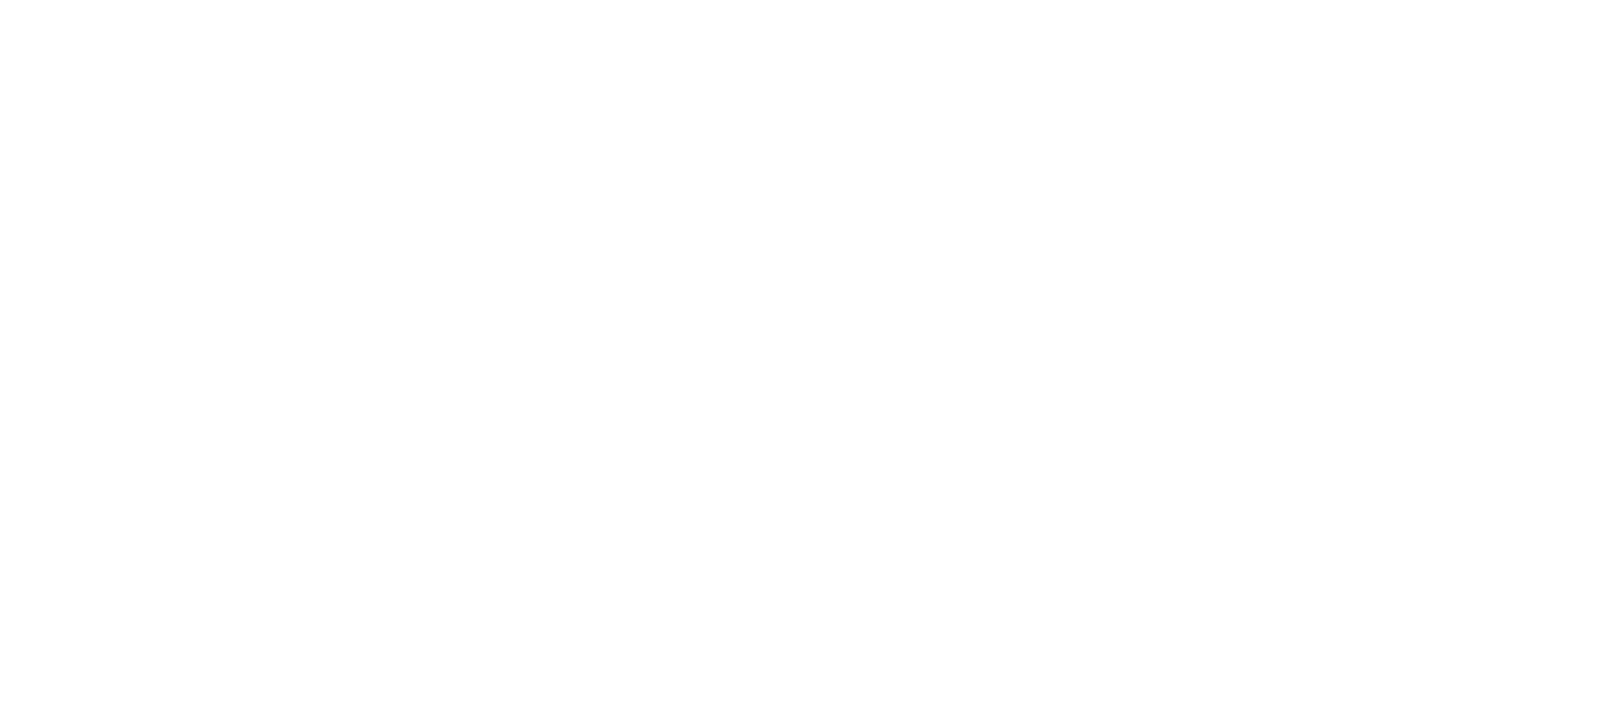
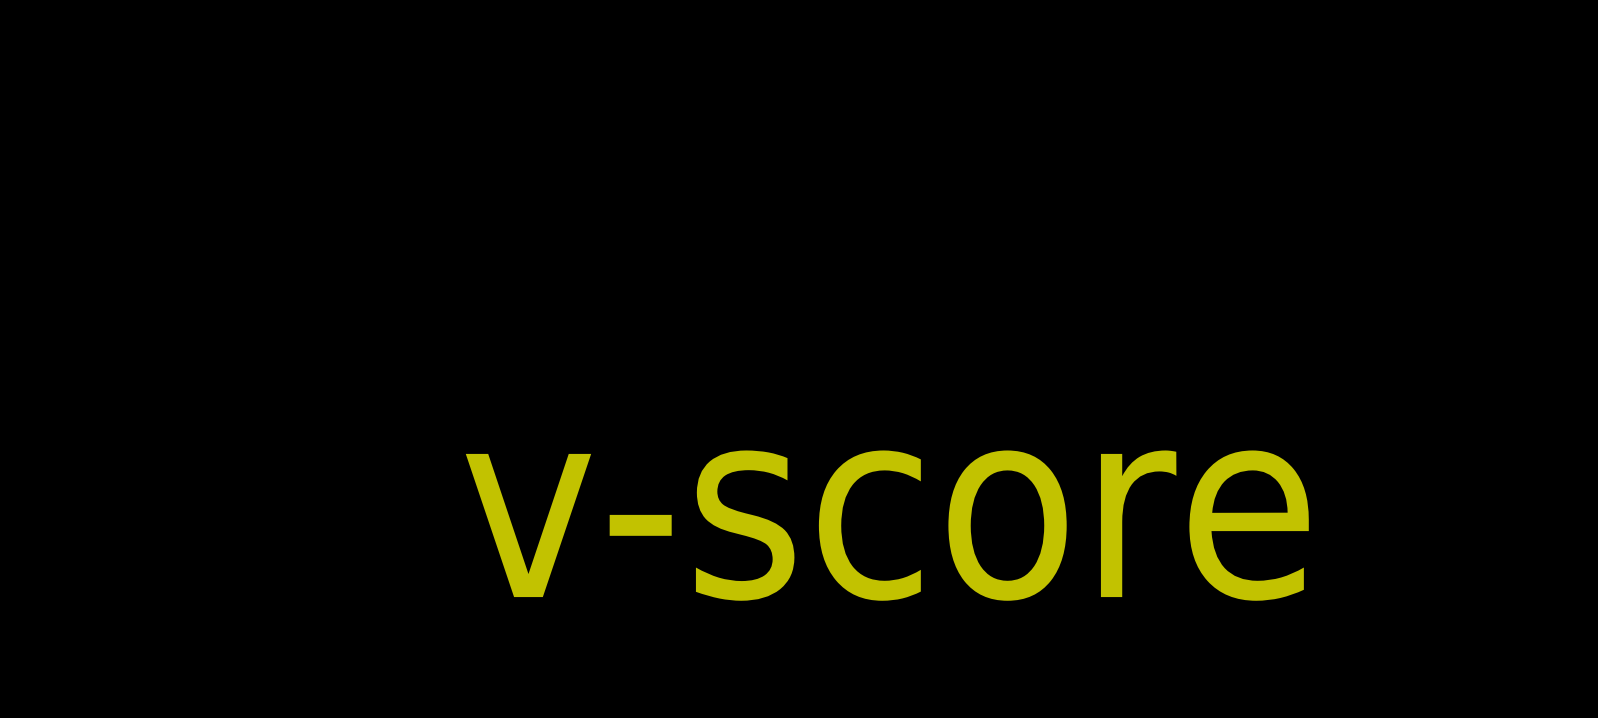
text: none -> v-score (887, 525)

